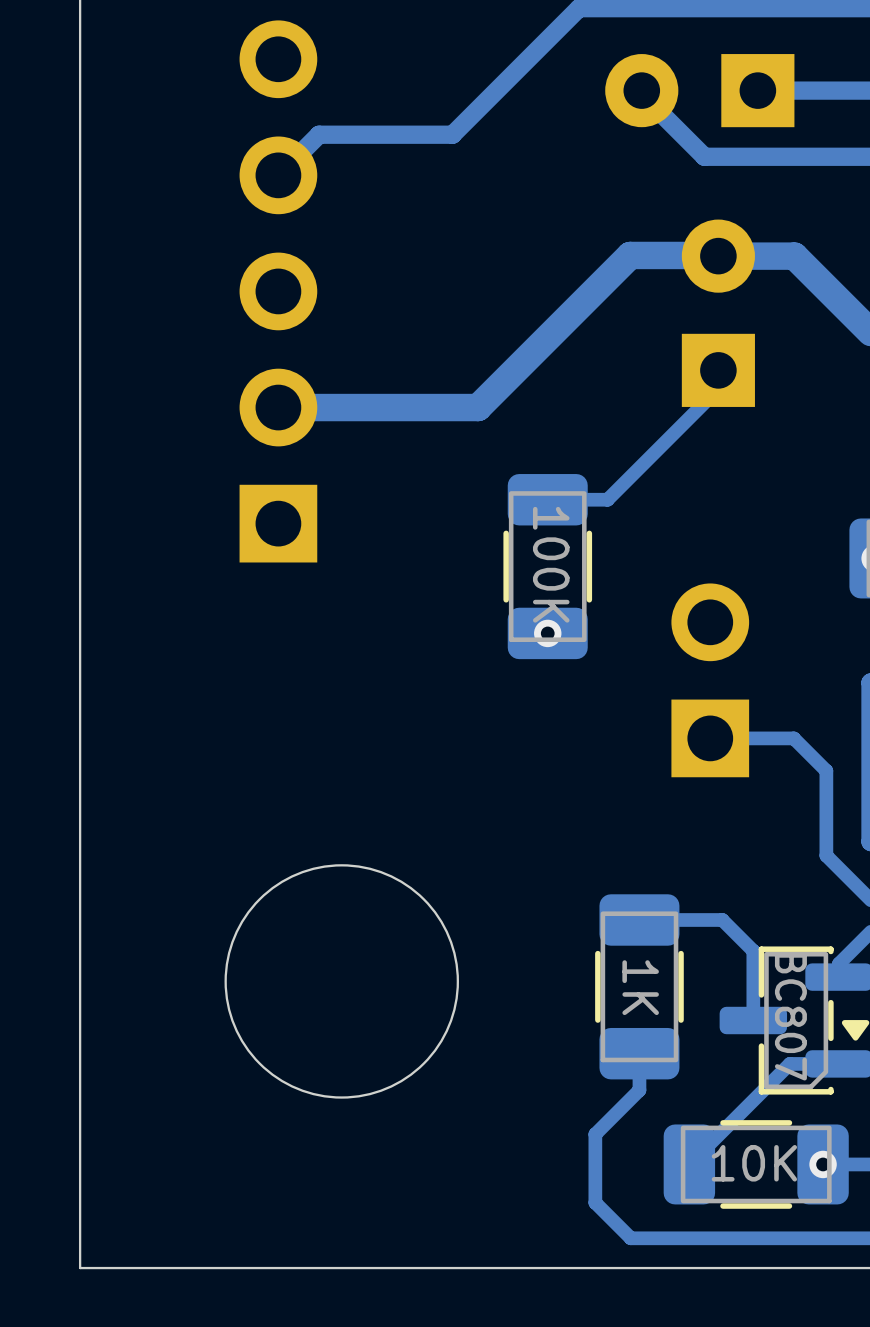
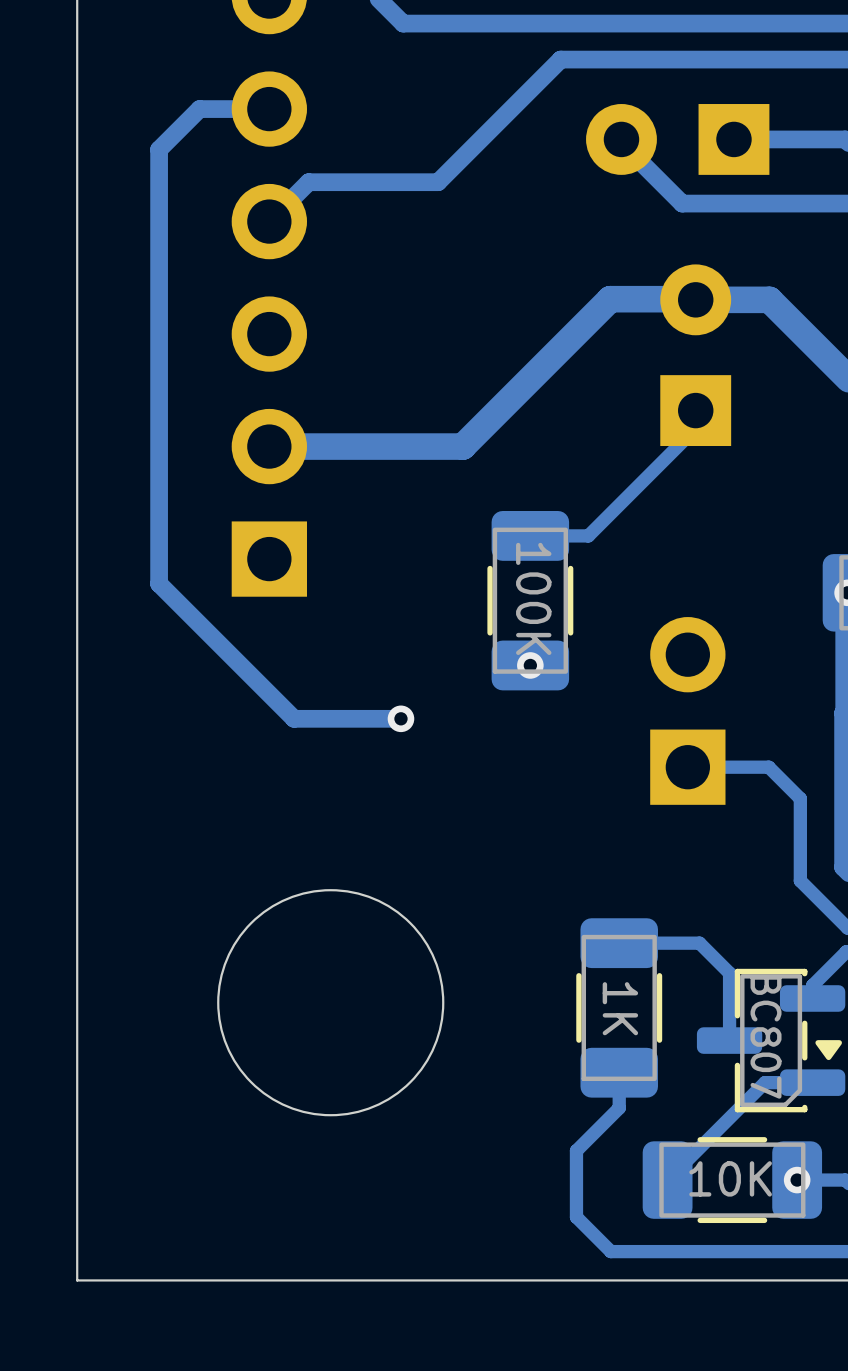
track: none -> (269, 109) (199, 109) (159, 149) (159, 583) (294, 718) (400, 718)
via: none -> (400, 718)

